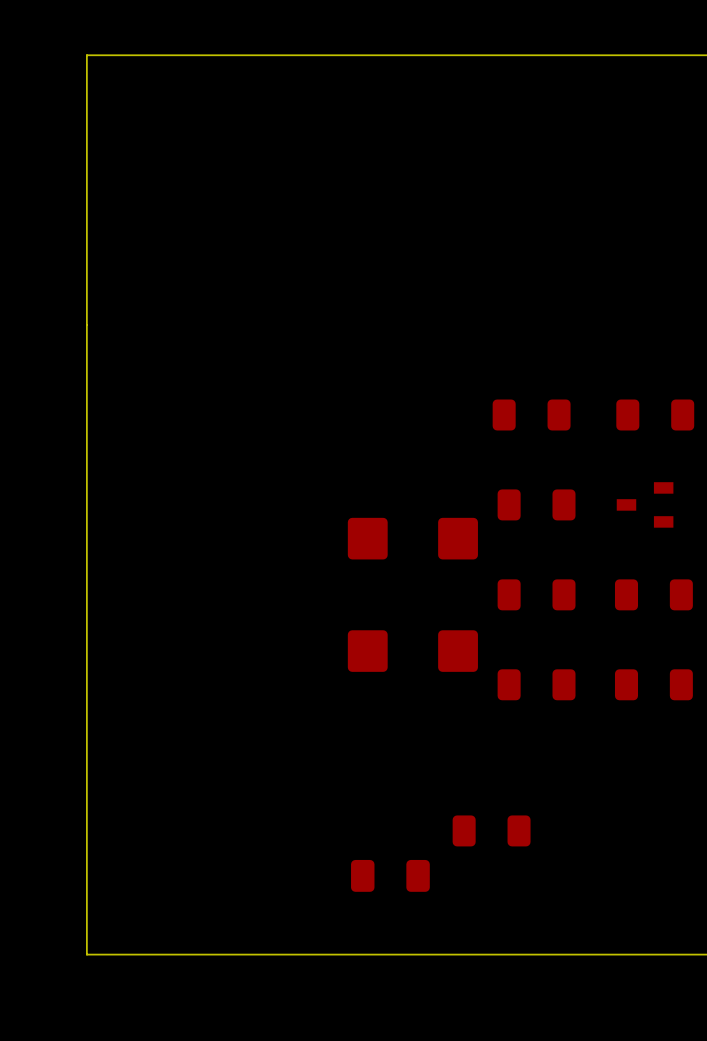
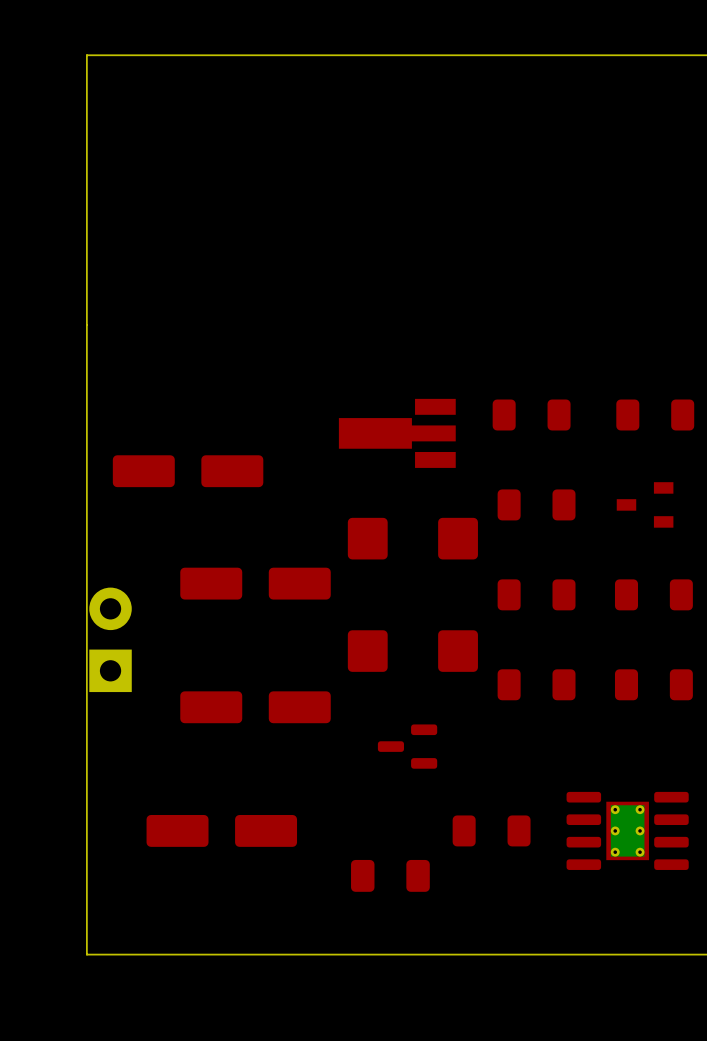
part: none -> (397, 433)
part: none -> (188, 471)
part: none -> (255, 583)
part: none -> (110, 639)
part: none -> (255, 707)
part: none -> (407, 746)
part: none -> (221, 830)
part: none -> (627, 830)

